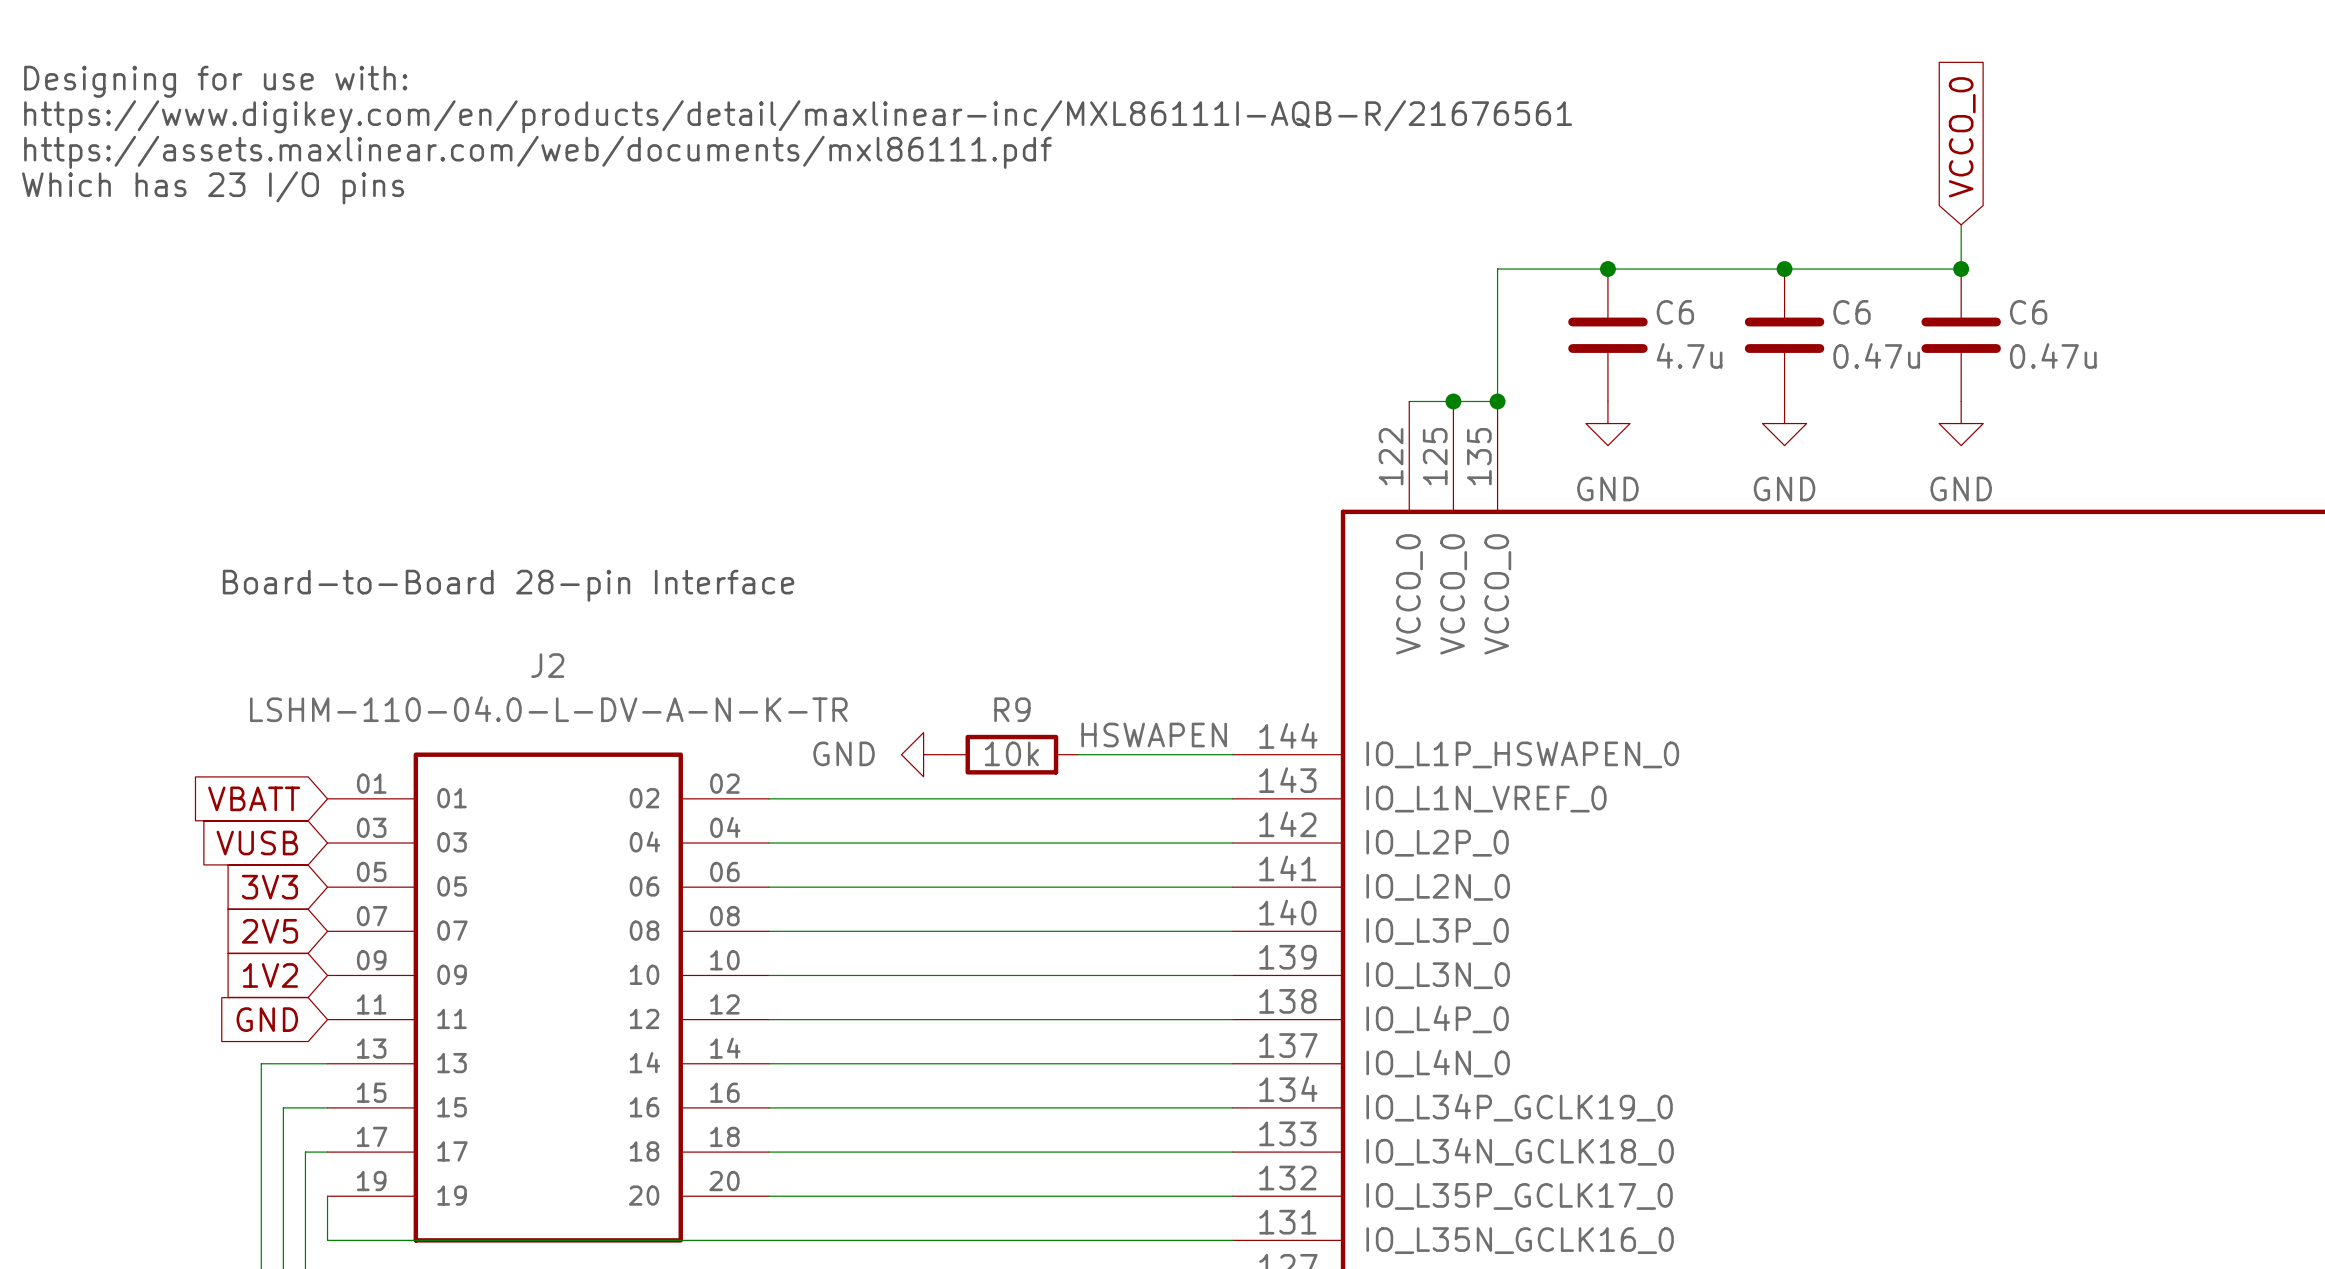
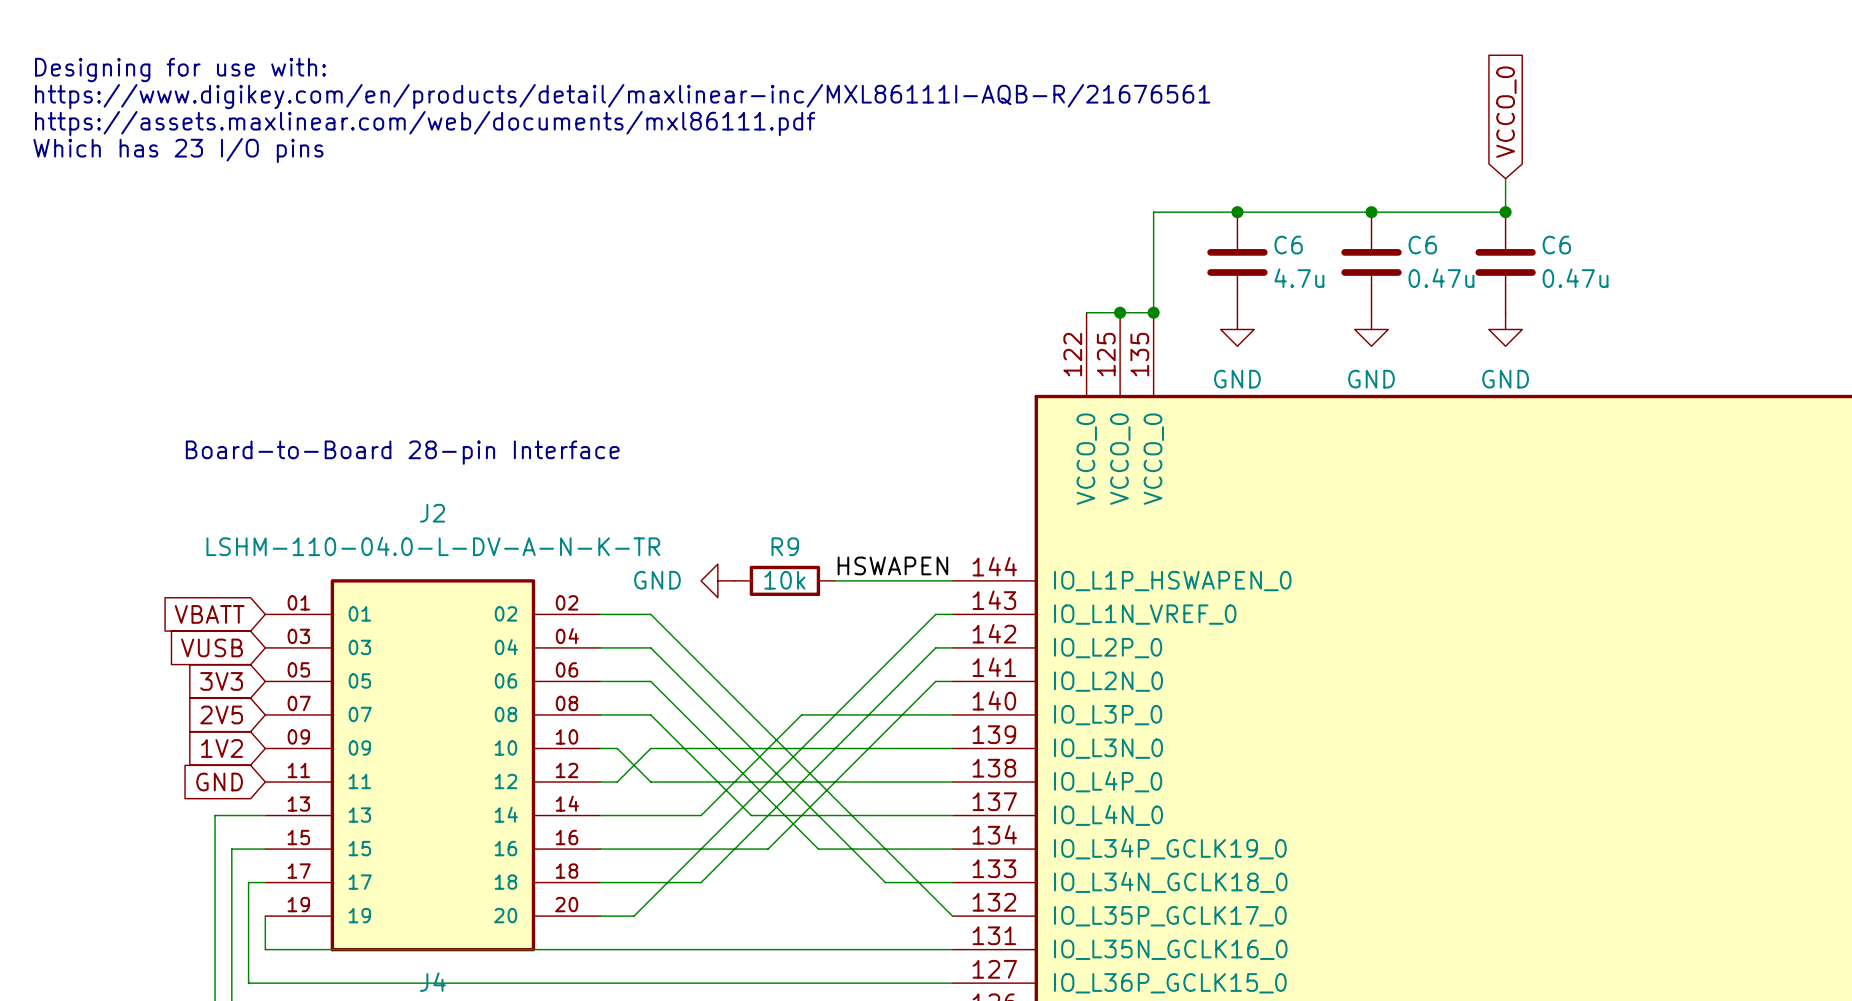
wire: (835, 798) (1210, 798) -> (650, 614) (952, 916)
wire: (835, 843) (1210, 843) -> (650, 647) (885, 882)
wire: (835, 887) (1210, 887) -> (650, 681) (818, 849)
wire: (835, 931) (1033, 931) -> (701, 815) (801, 714)
wire: (791, 975) (835, 975) -> (617, 748) (650, 782)
wire: (791, 1019) (835, 1019) -> (617, 782) (650, 748)
wire: (901, 1063) (967, 1063) -> (650, 714) (751, 815)
wire: (989, 1107) (1056, 1107) -> (768, 849) (935, 681)
wire: (901, 1152) (1144, 1152) -> (701, 882) (935, 647)
wire: (813, 1196) (1232, 1196) -> (634, 916) (935, 614)

